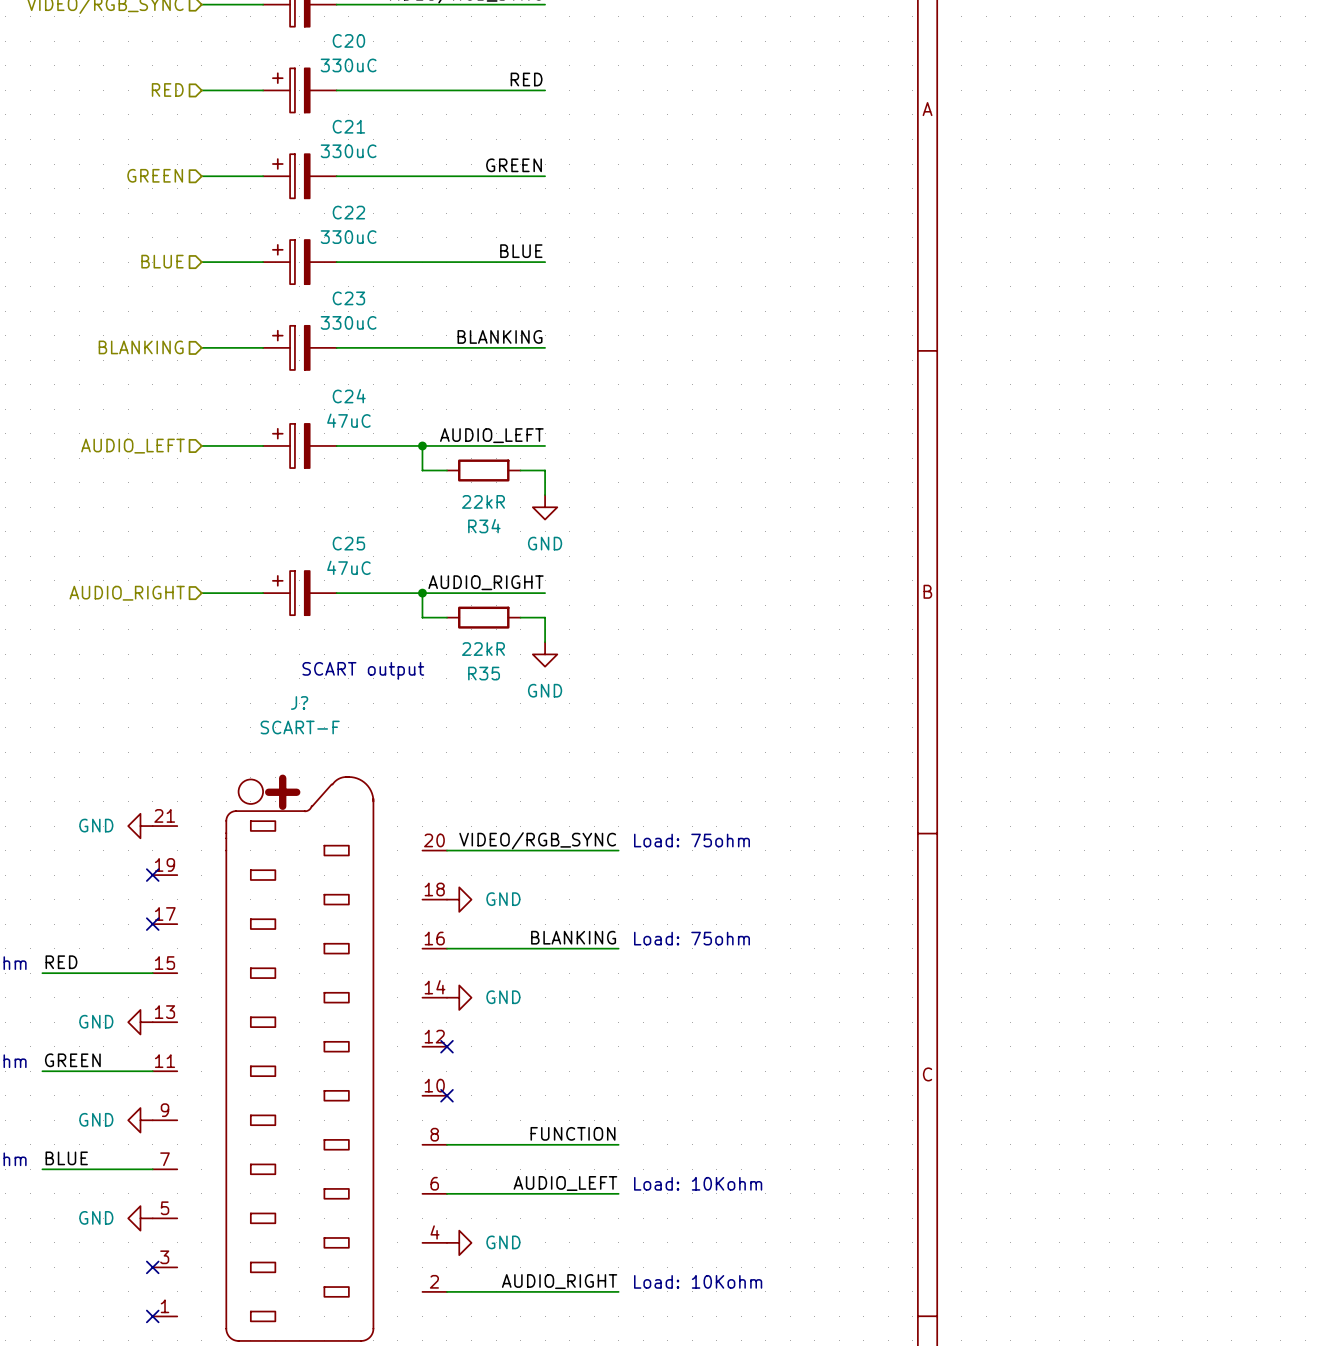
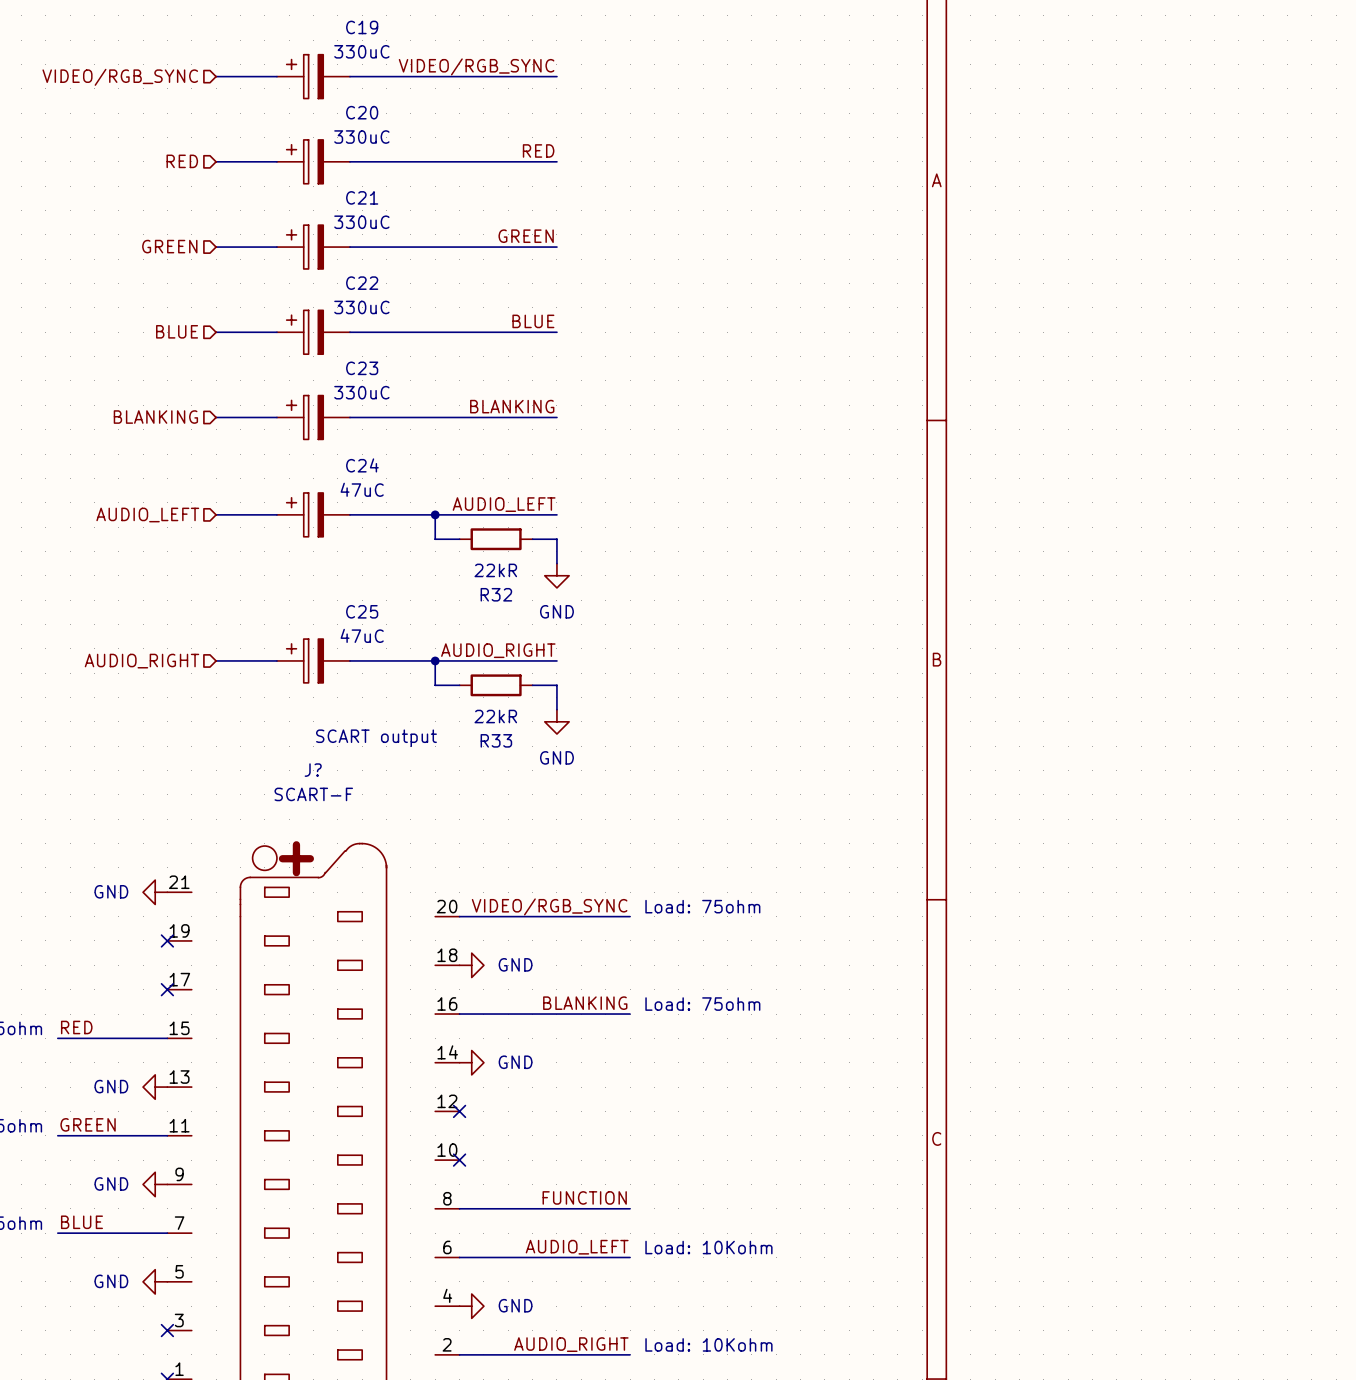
R34 name: R34 (484, 526) -> R32 (496, 594)
R35 name: R35 (484, 673) -> R33 (496, 740)

